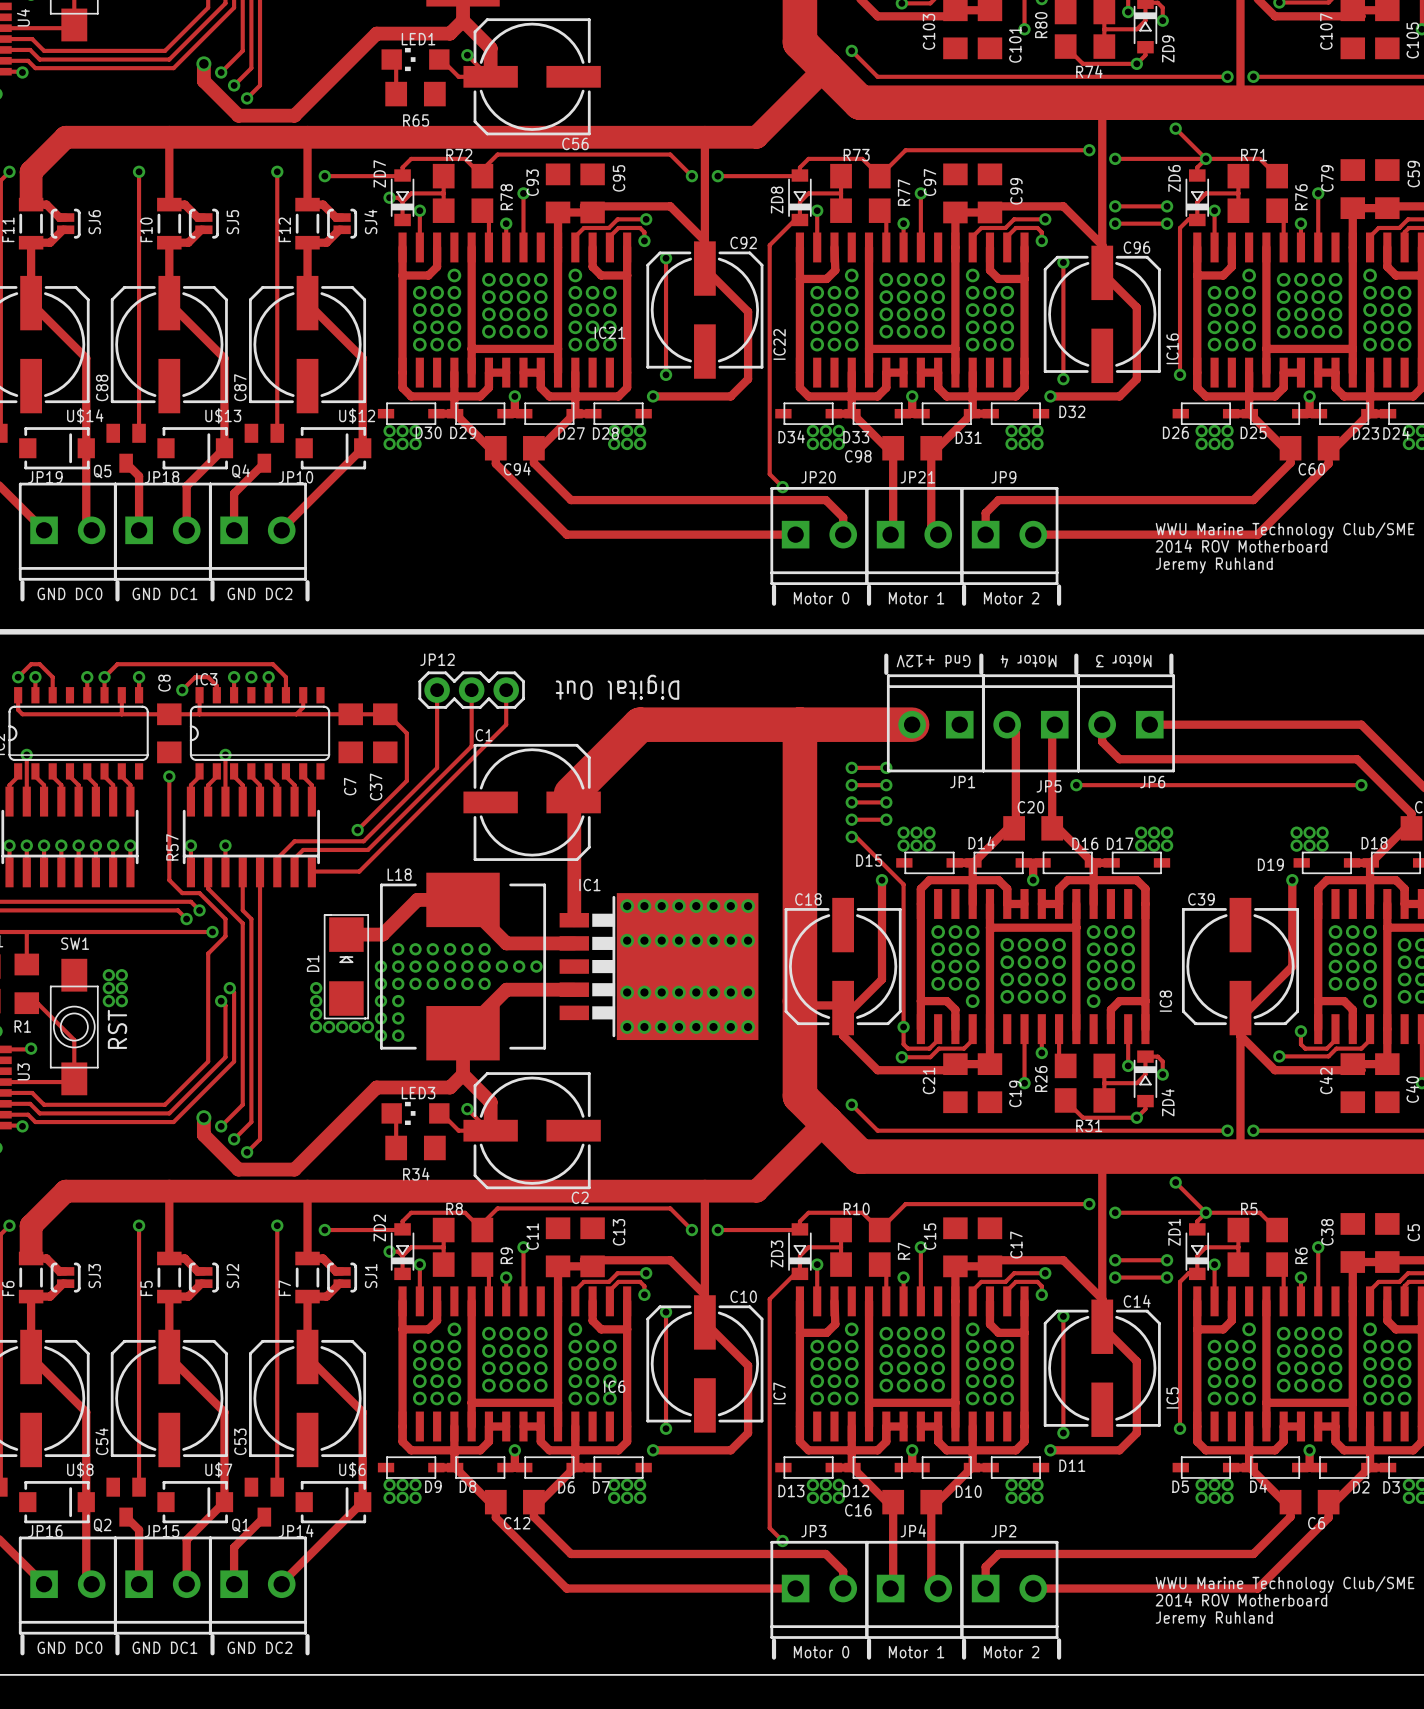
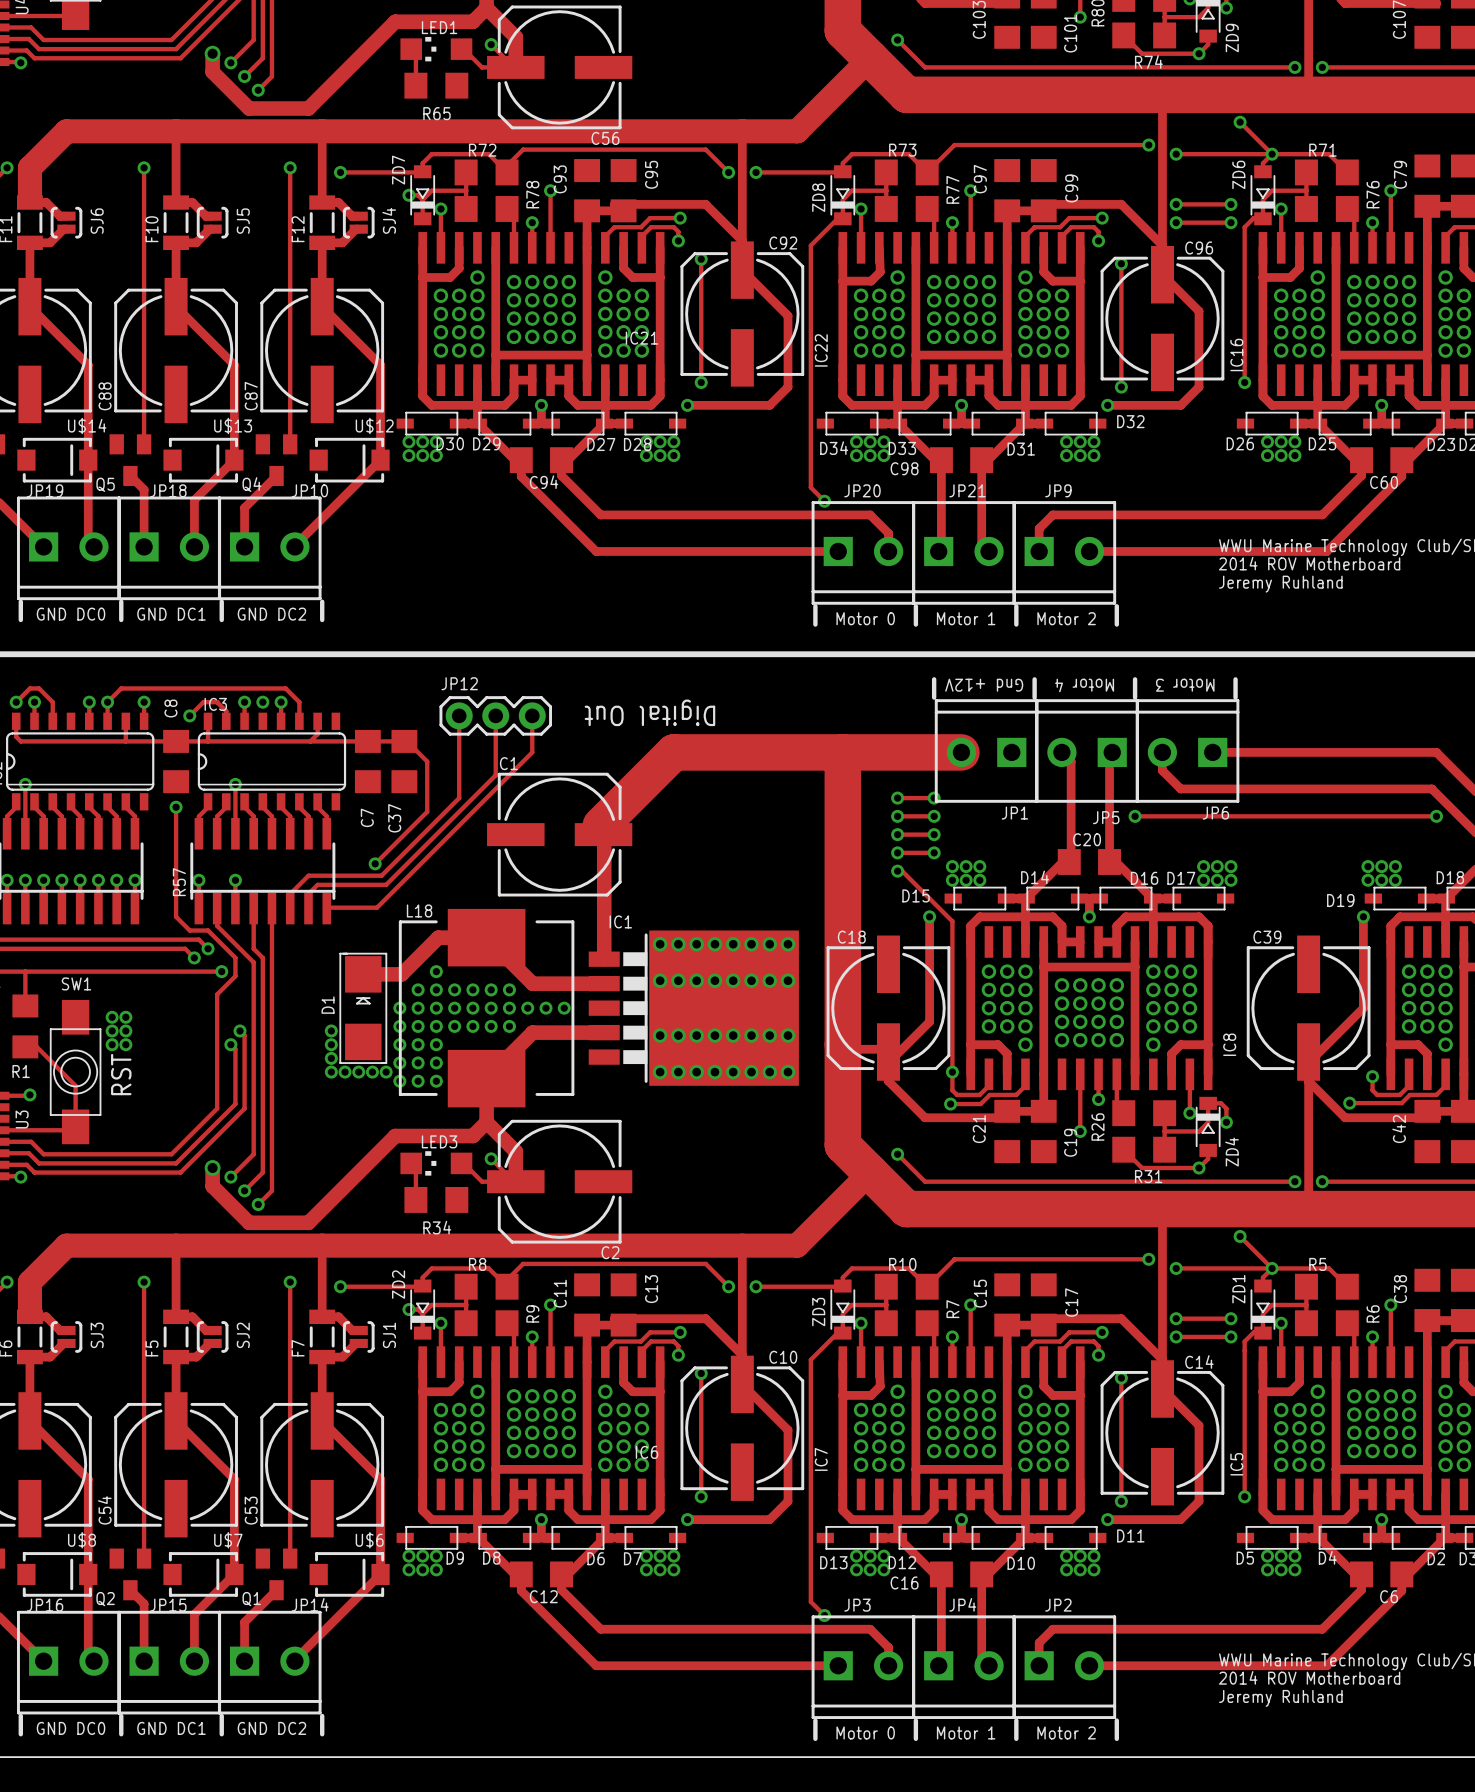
via: none -> (436, 971)
via: none -> (436, 1044)
via: none -> (436, 1062)
via: none -> (436, 1081)

